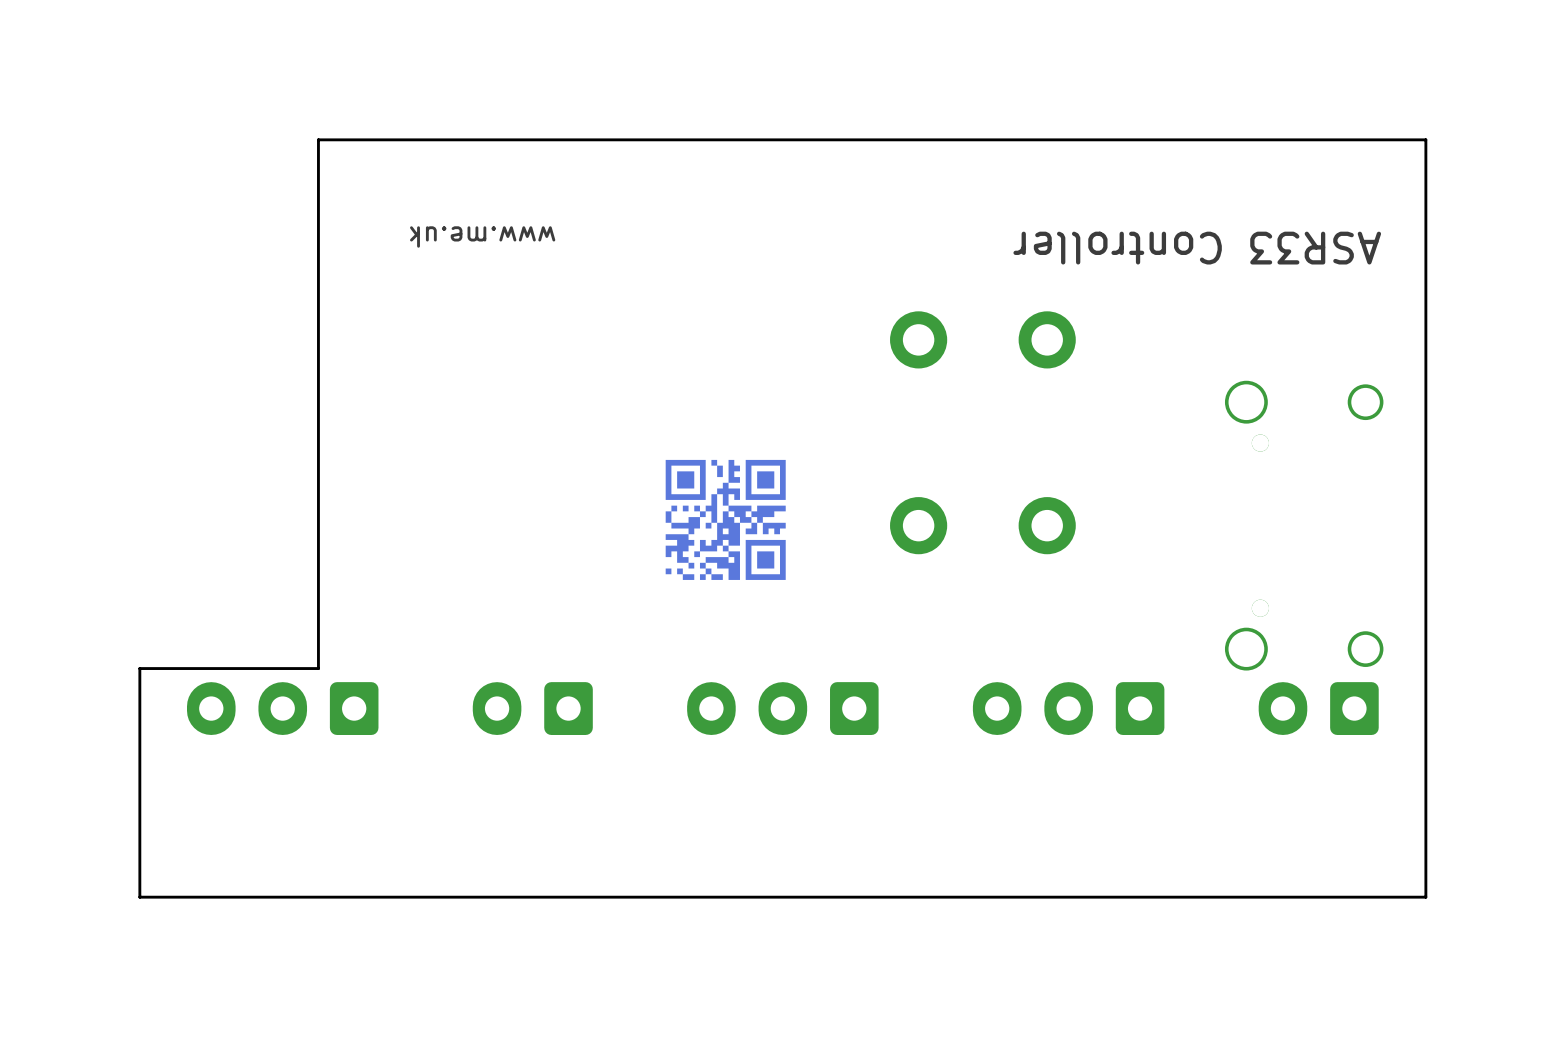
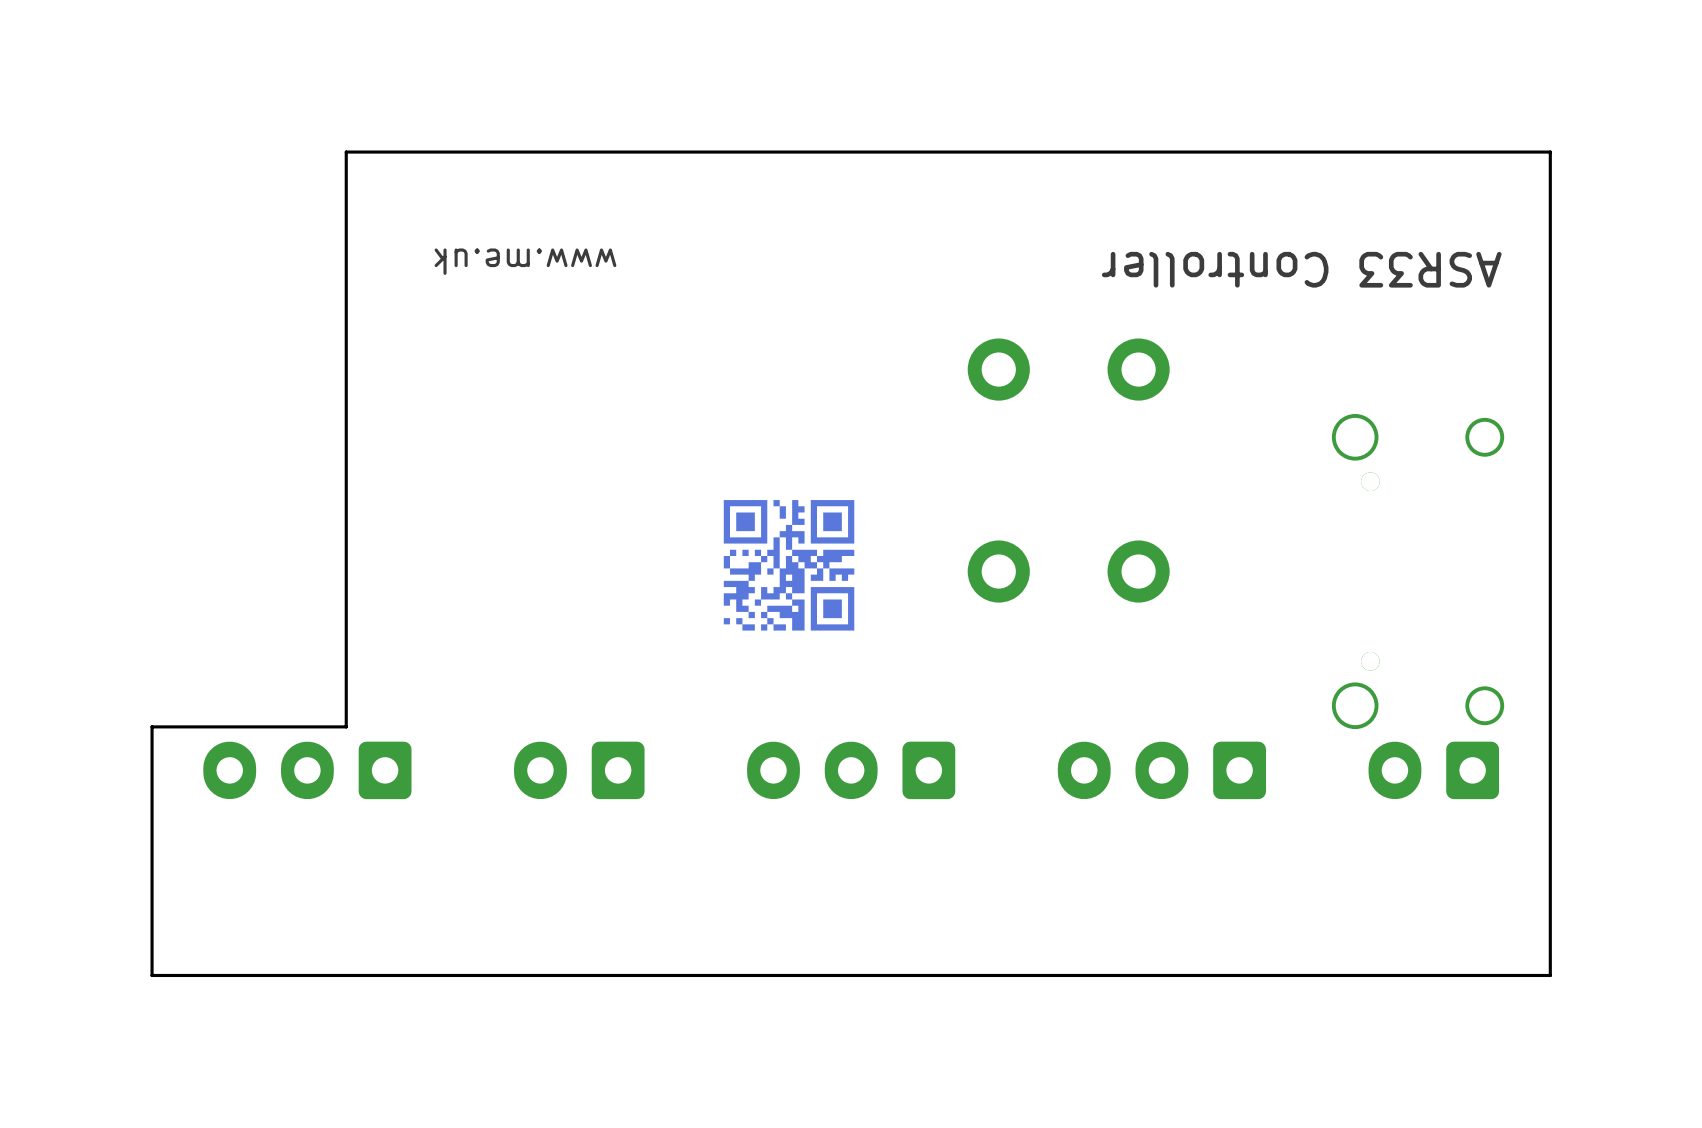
drawing: [410, 226, 556, 248] -> none
text: none -> www.me.uk (525, 261)

